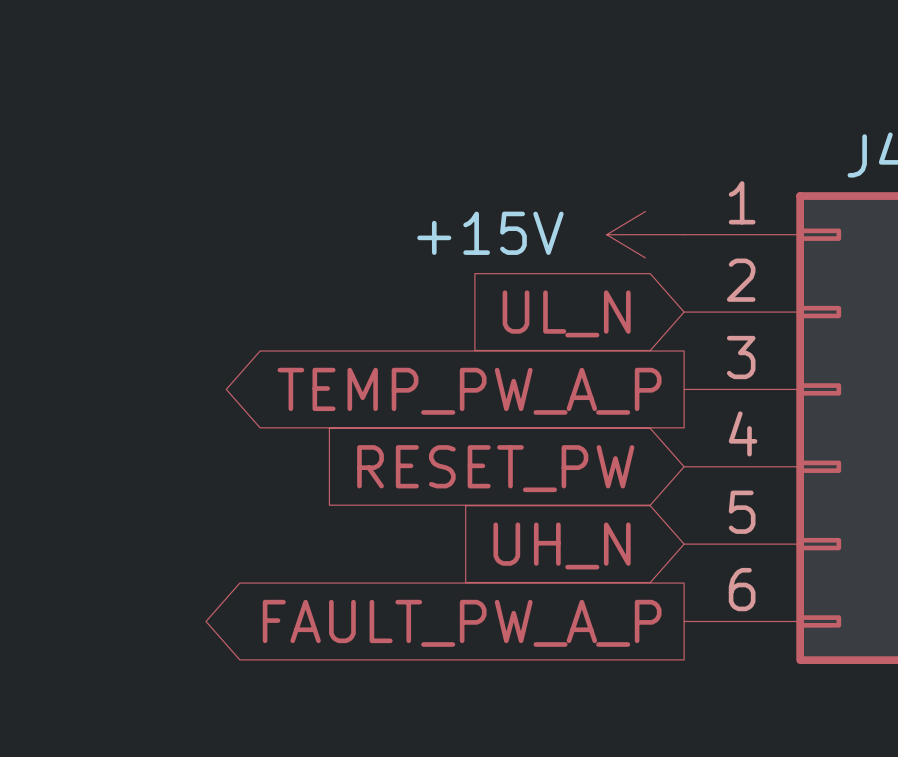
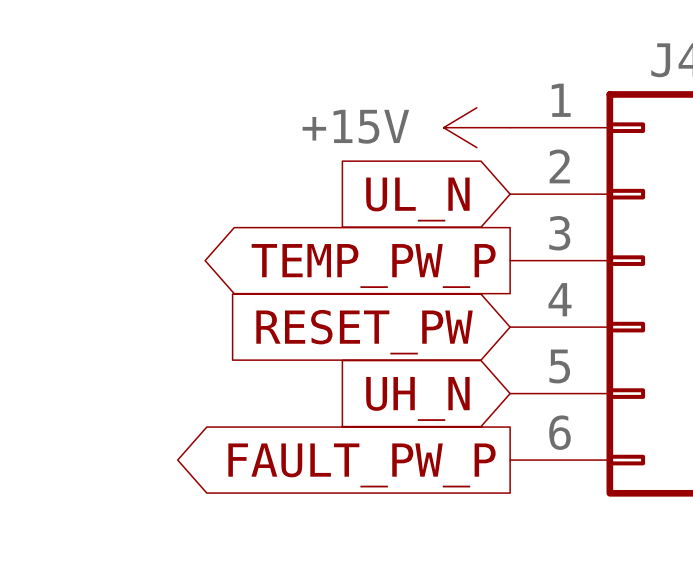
global label: TEMP_PW_A_P (469, 391) -> TEMP_PW_P (373, 266)
global label: FAULT_PW_A_P (462, 623) -> FAULT_PW_P (361, 465)

